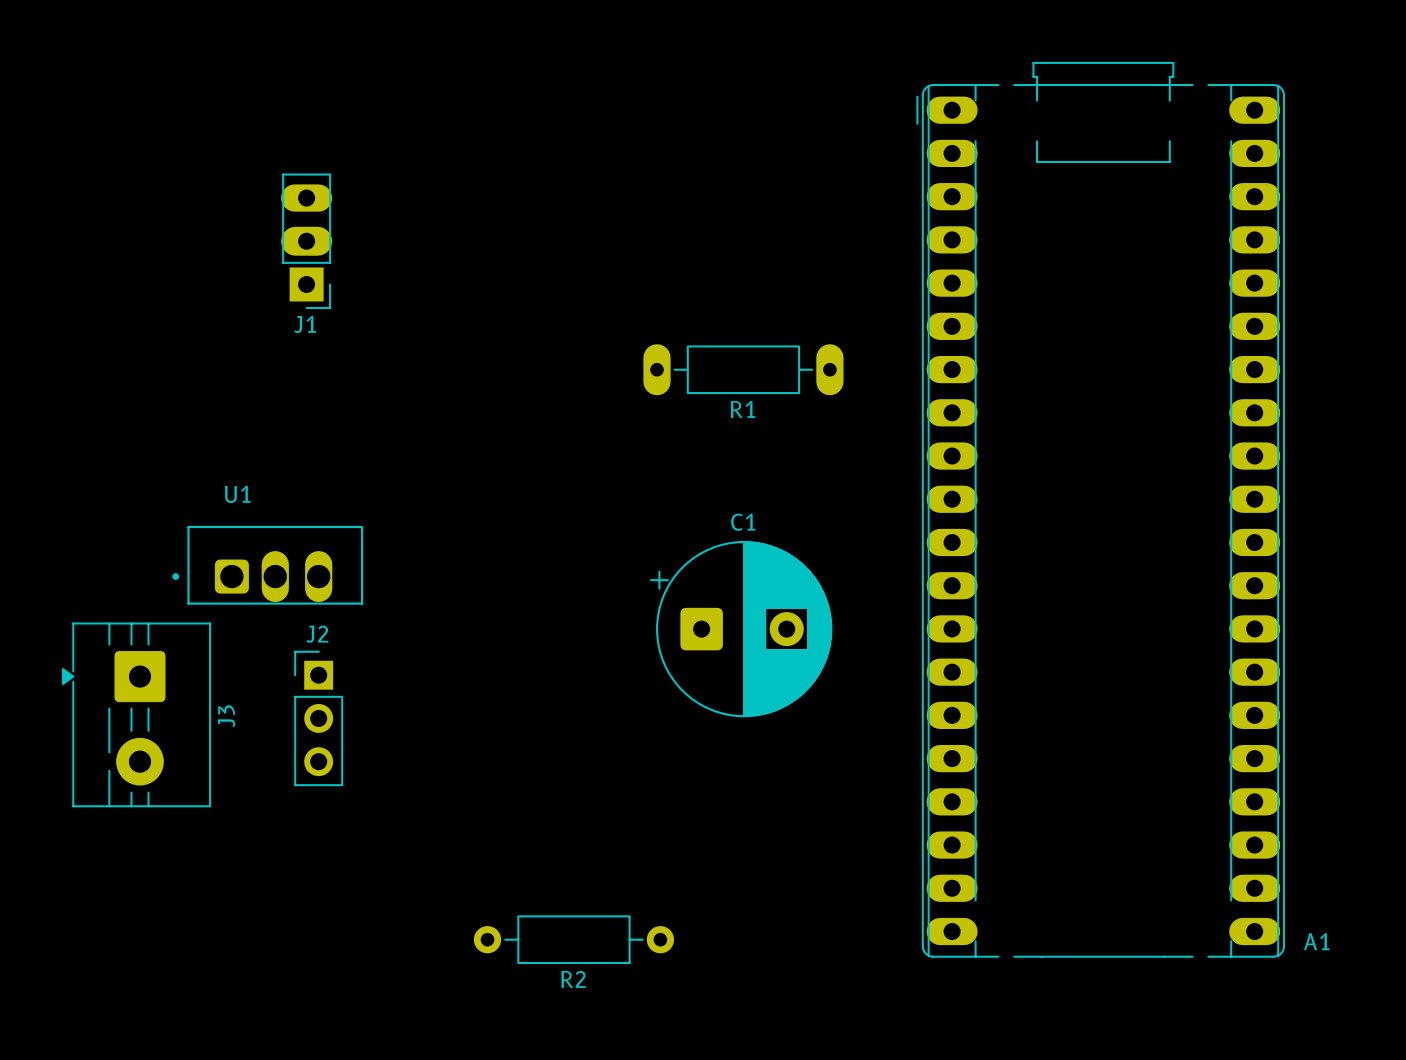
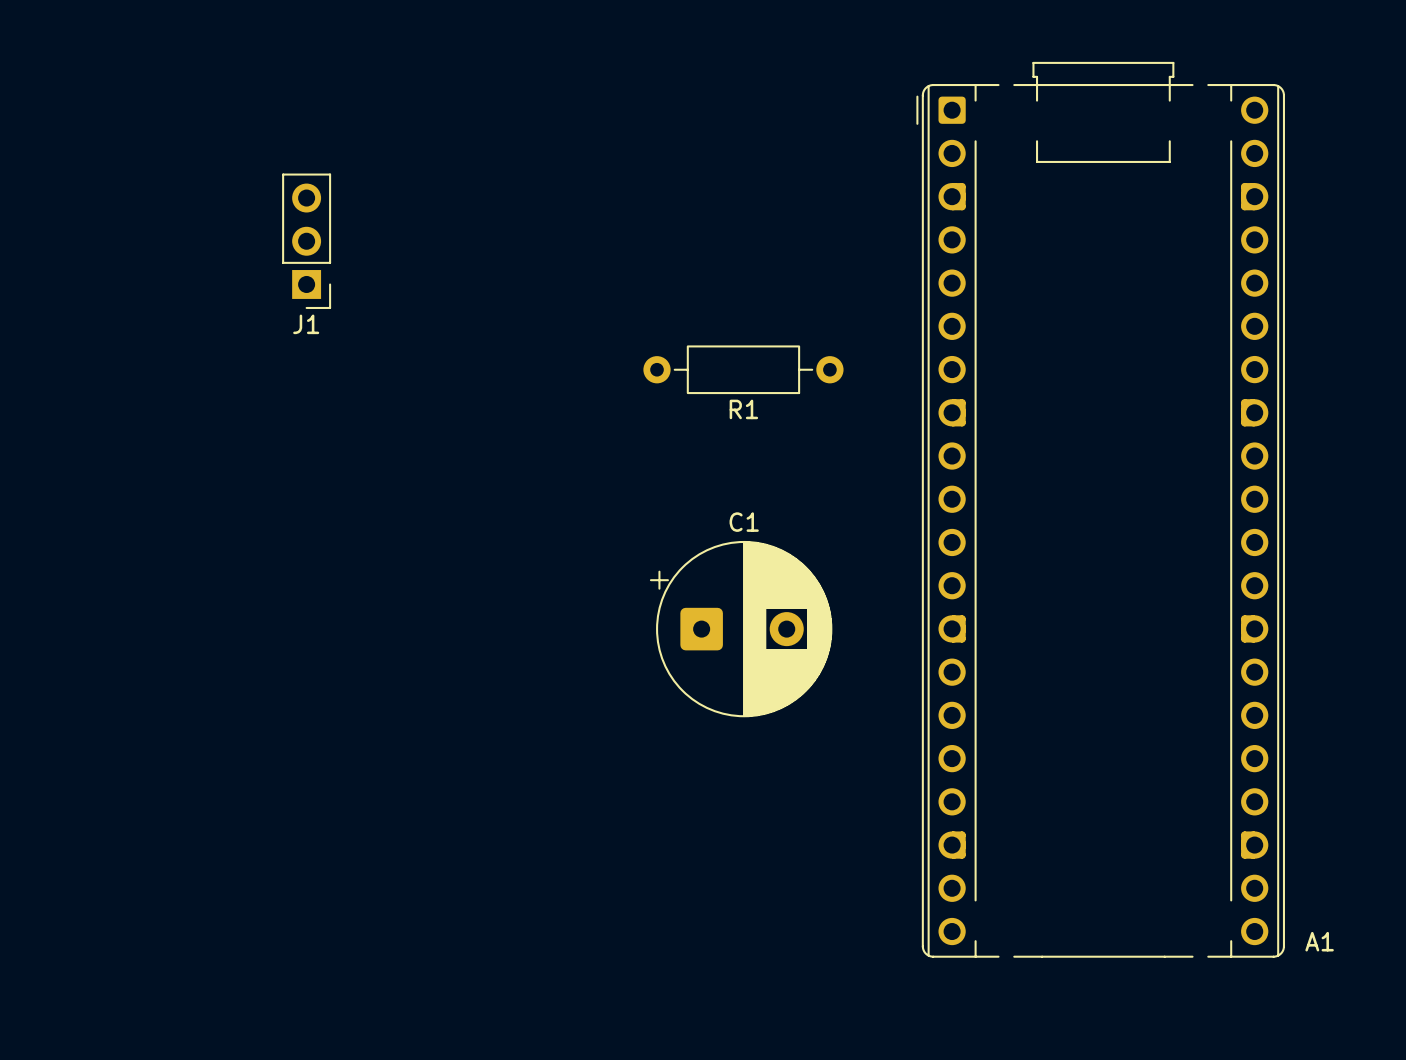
A1 footprint: [916, 61, 1285, 958] -> [916, 61, 1285, 958]
J1 footprint: [281, 173, 333, 309] -> [282, 173, 332, 309]
R1 footprint: [643, 344, 844, 396] -> [643, 345, 844, 395]
U1: (267, 565) -> none
J3: (136, 714) -> none
J2: (318, 718) -> none
R2: (573, 939) -> none

